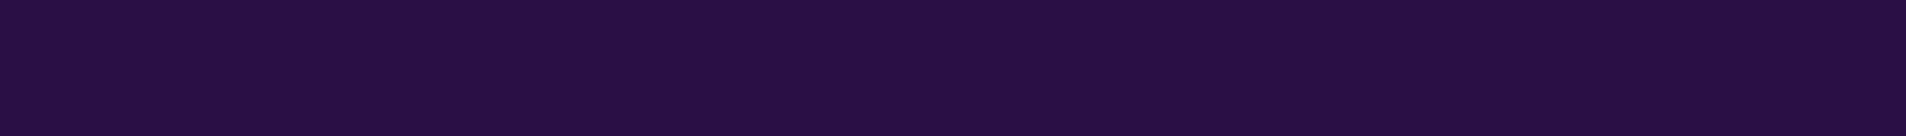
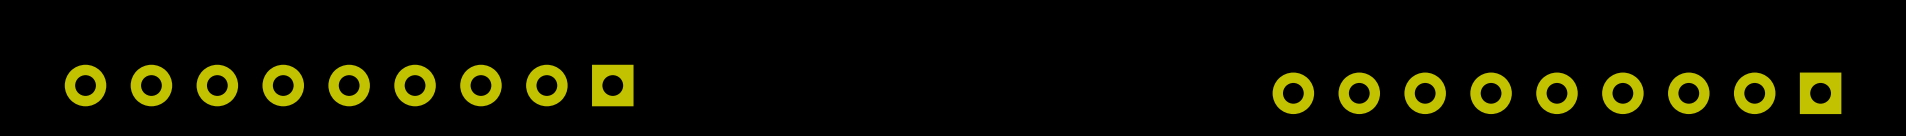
part: none -> (349, 85)
part: none -> (1556, 93)

